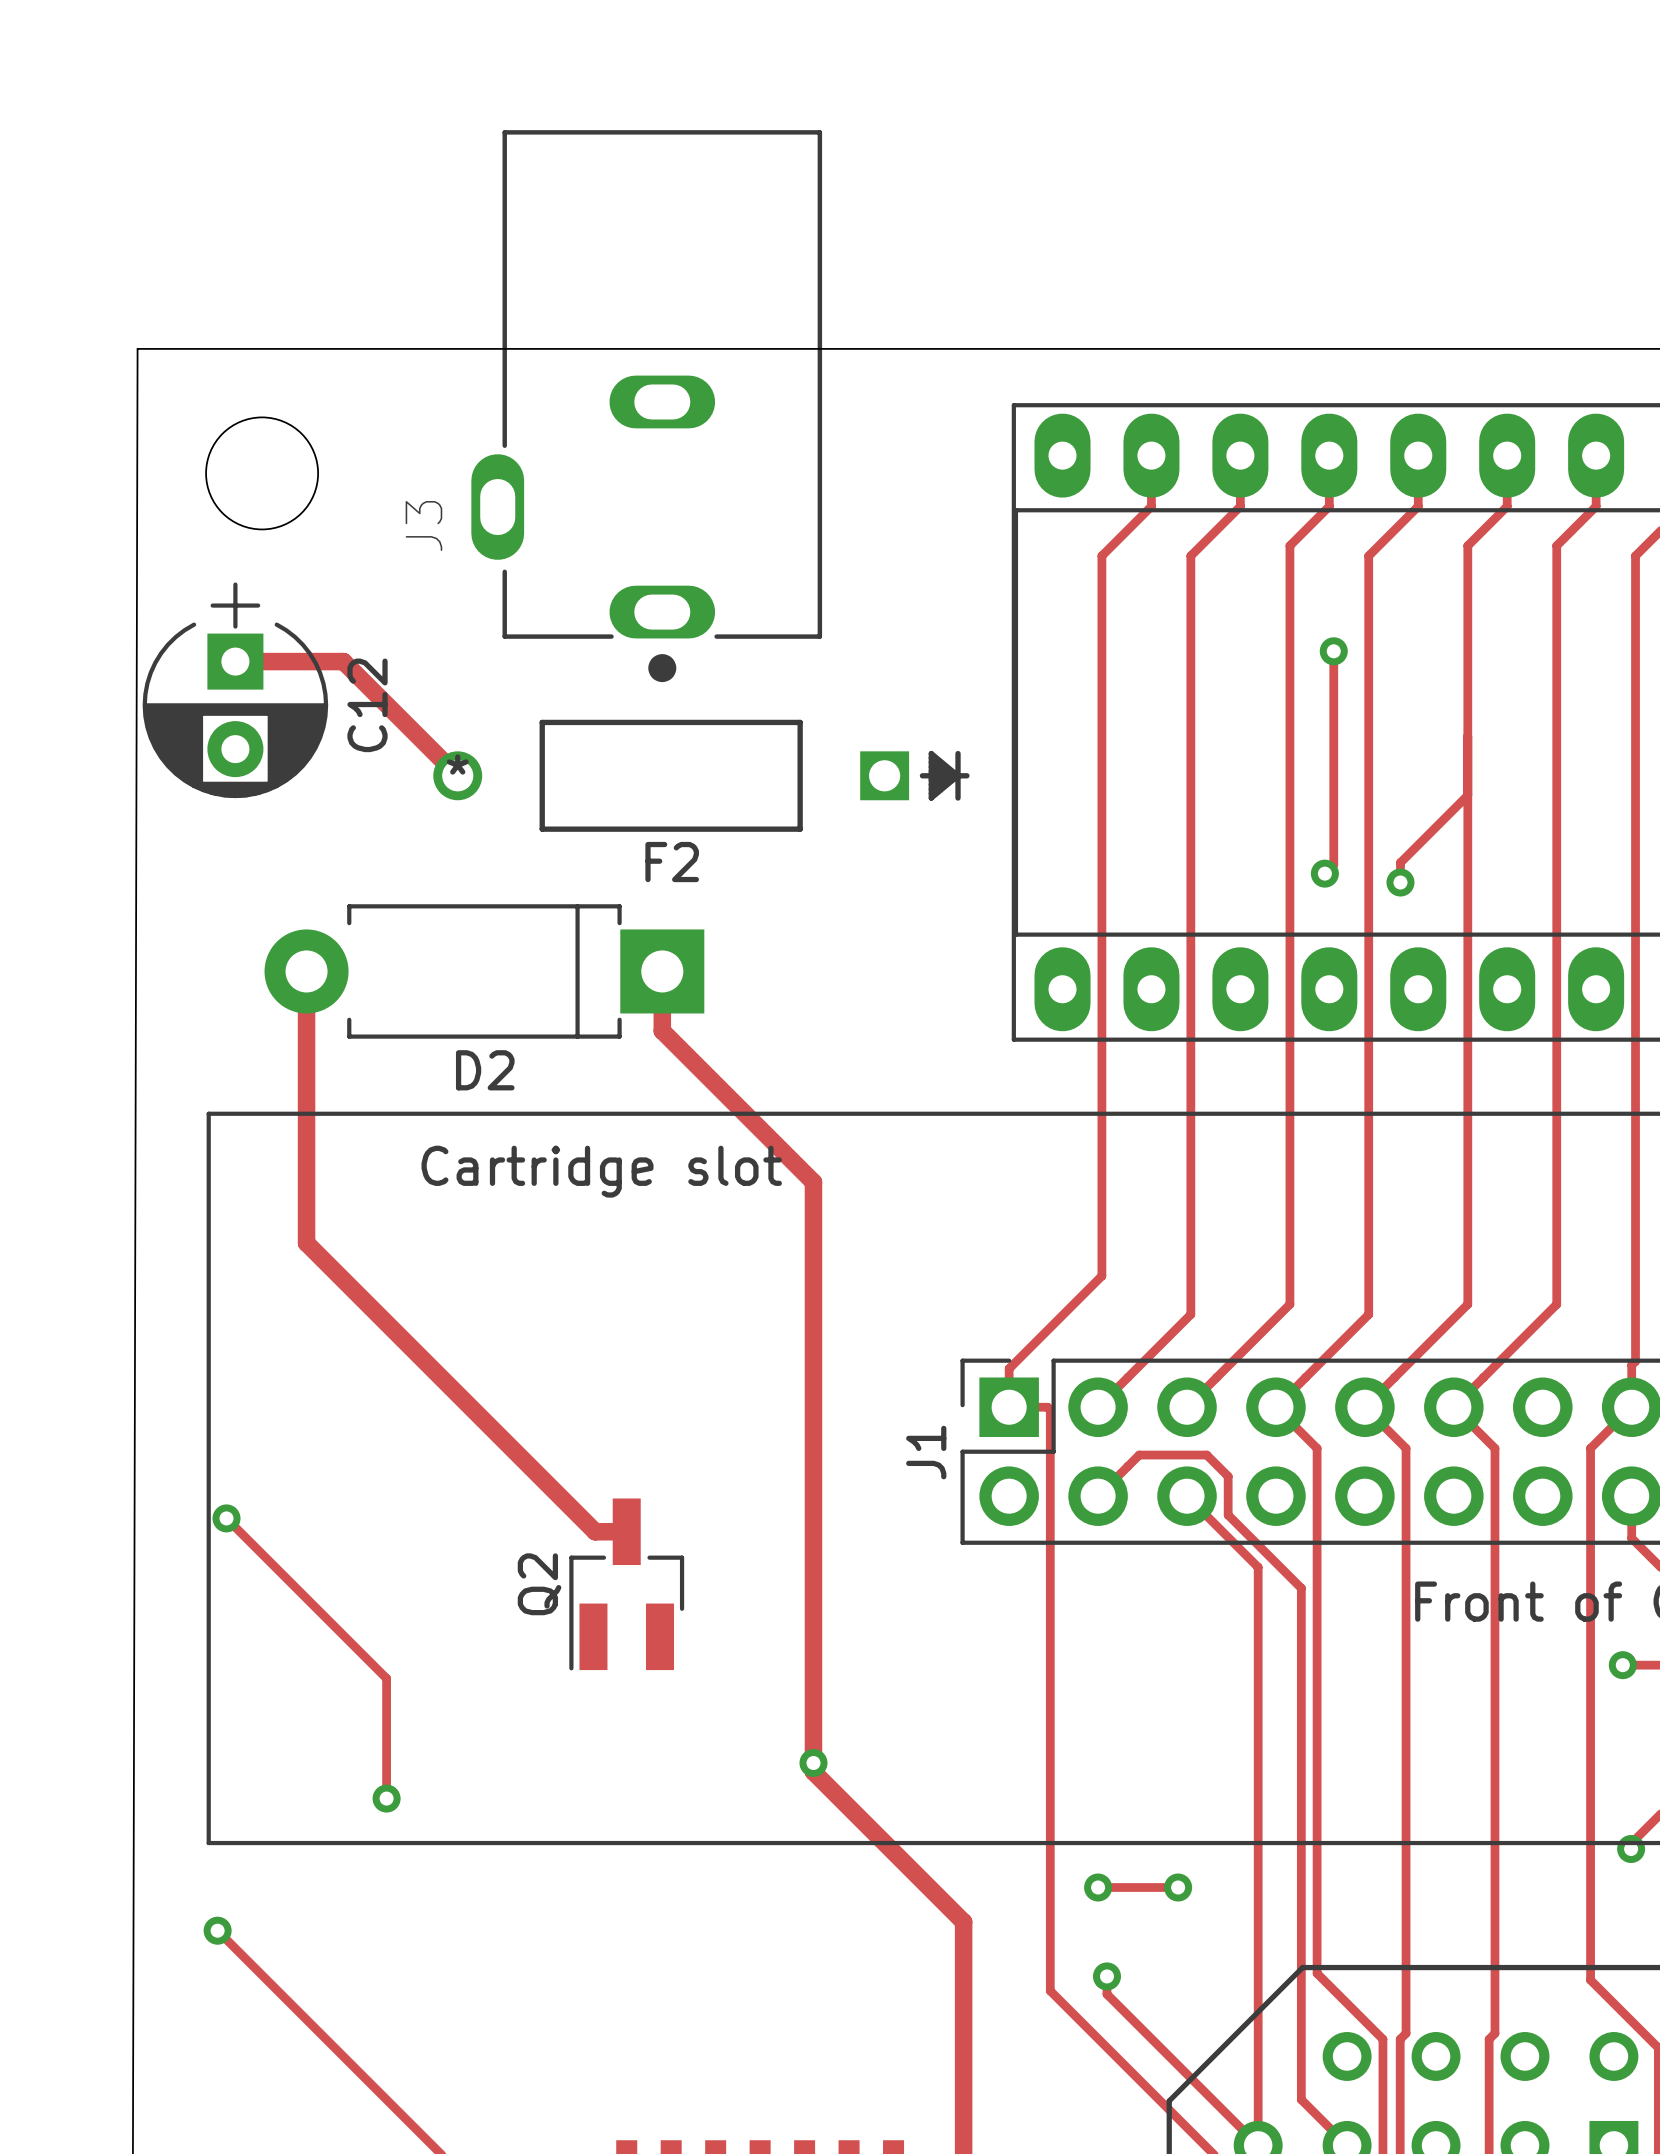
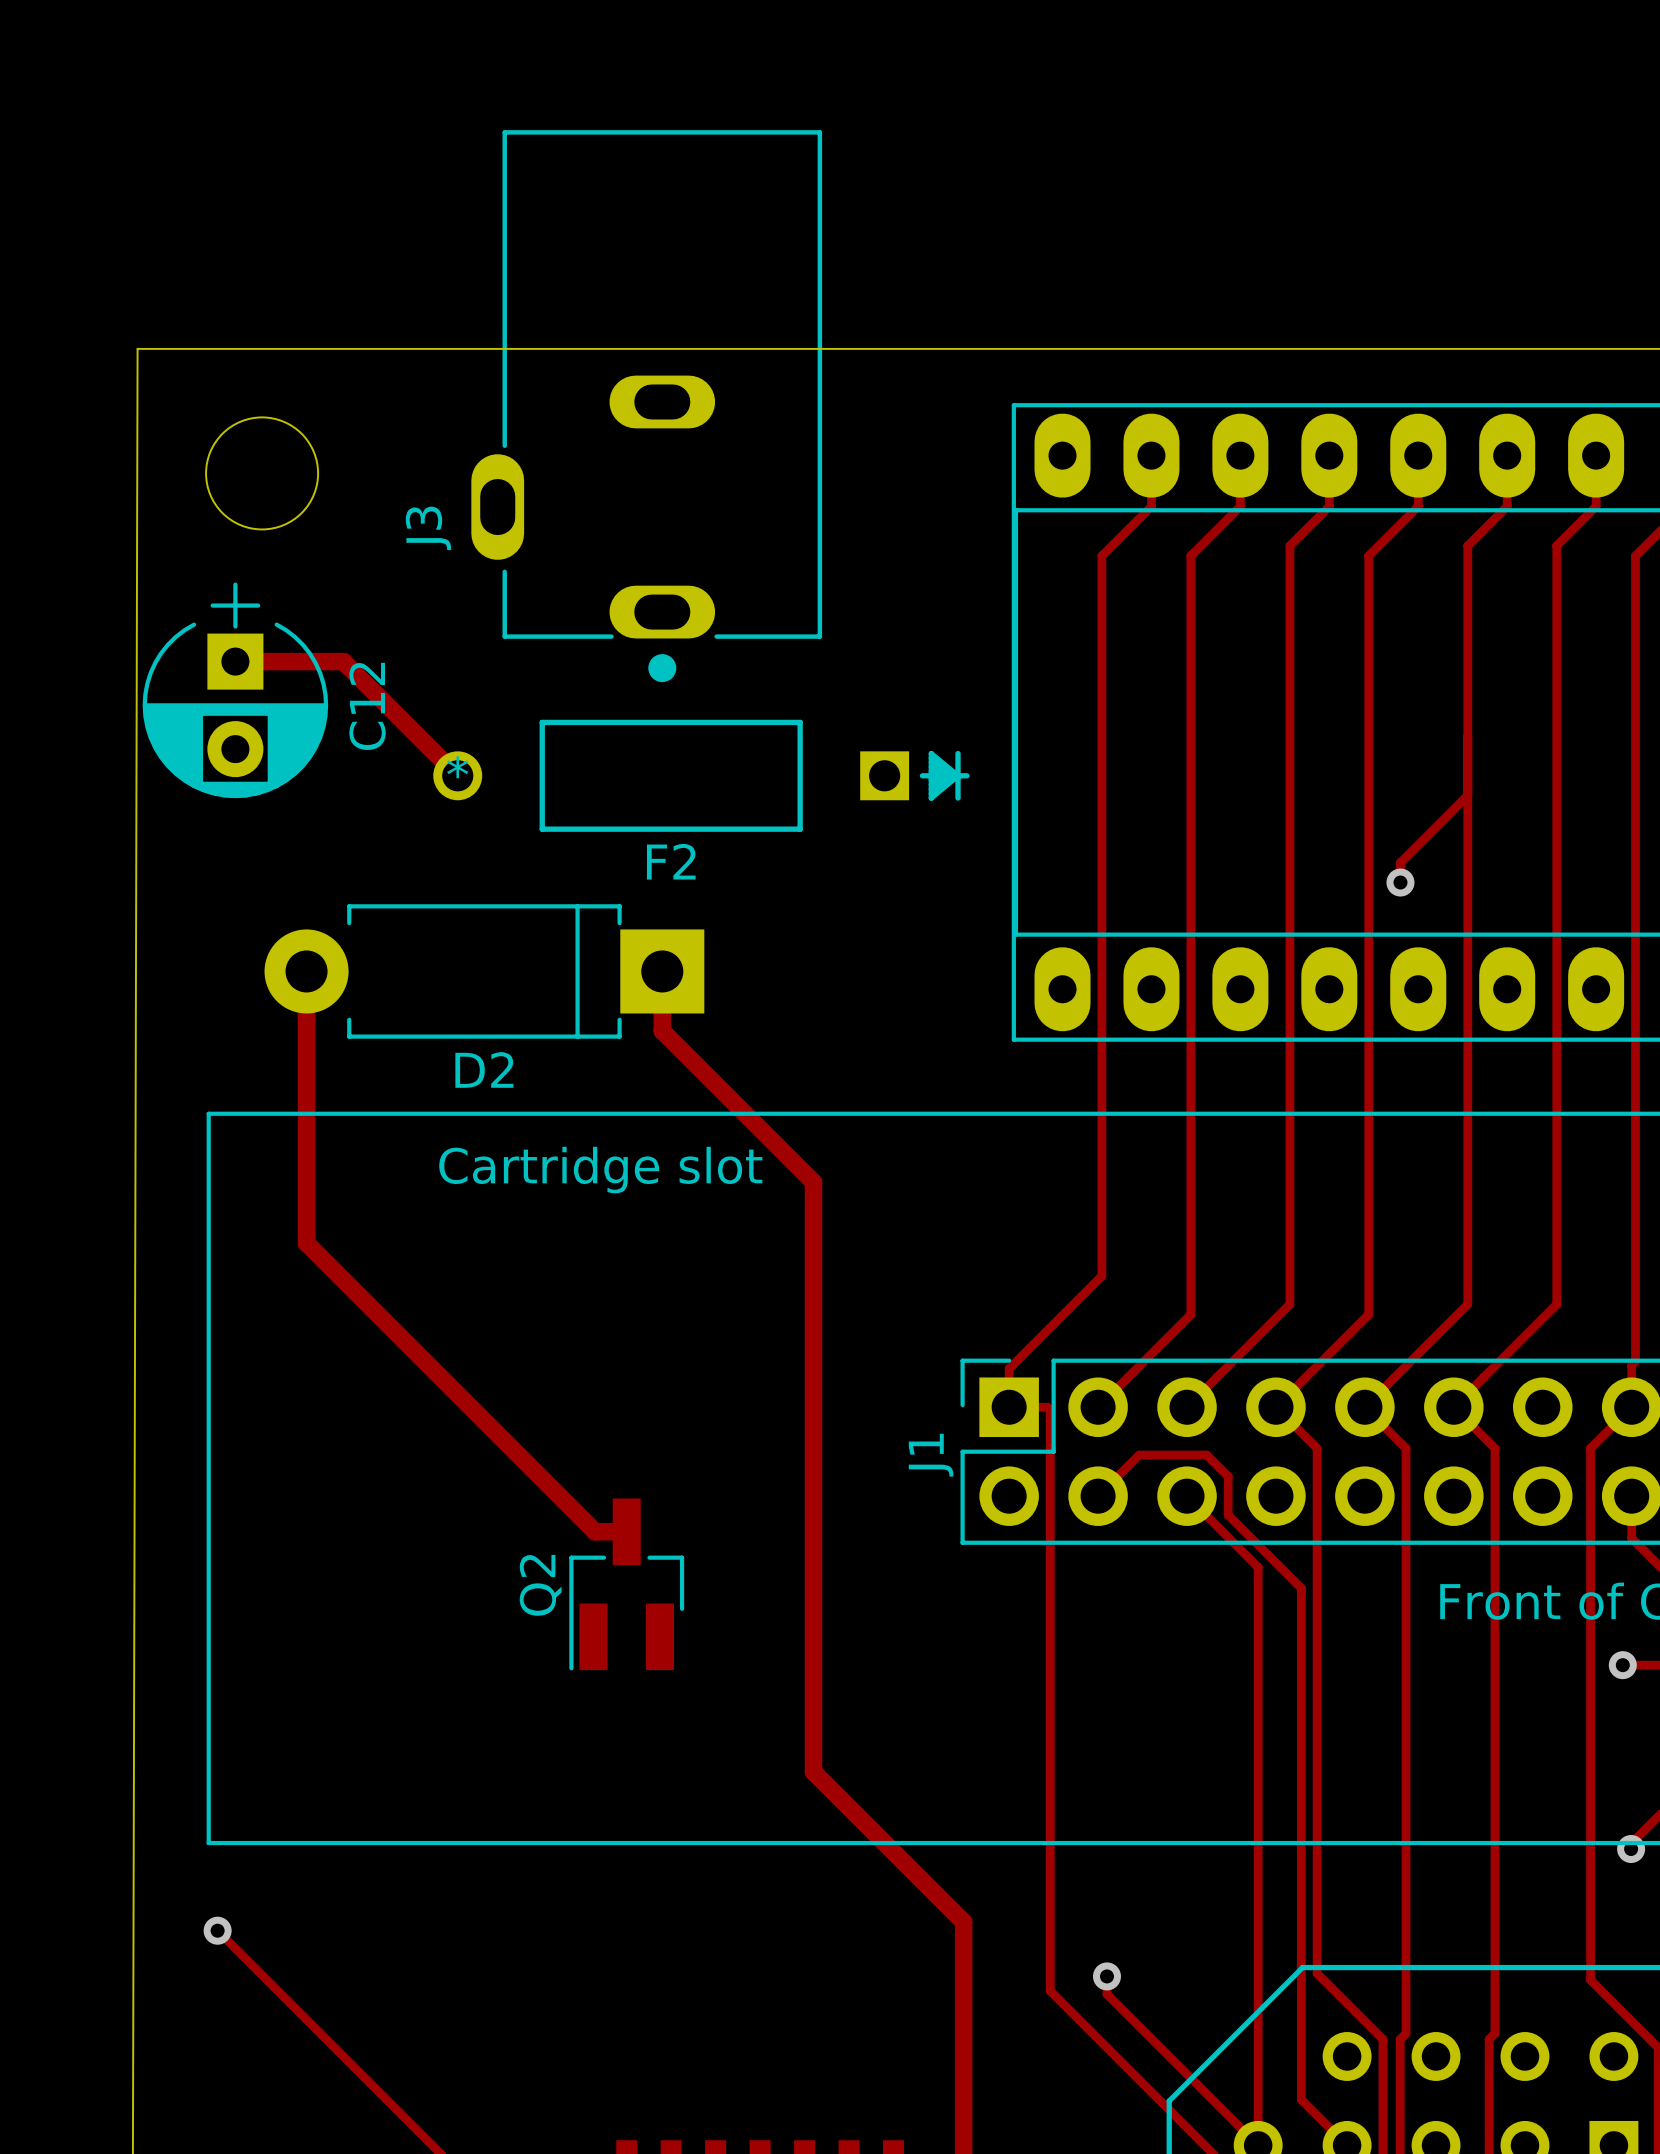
track: (1333, 651) (1333, 864) (1324, 873) -> none
via: (1333, 651) -> none
via: (1324, 873) -> none
track: (226, 1518) (386, 1678) (386, 1798) -> none
via: (226, 1518) -> none
via: (813, 1762) -> none
via: (386, 1798) -> none
track: (1098, 1887) (1178, 1887) -> none
via: (1098, 1887) -> none
via: (1178, 1887) -> none

